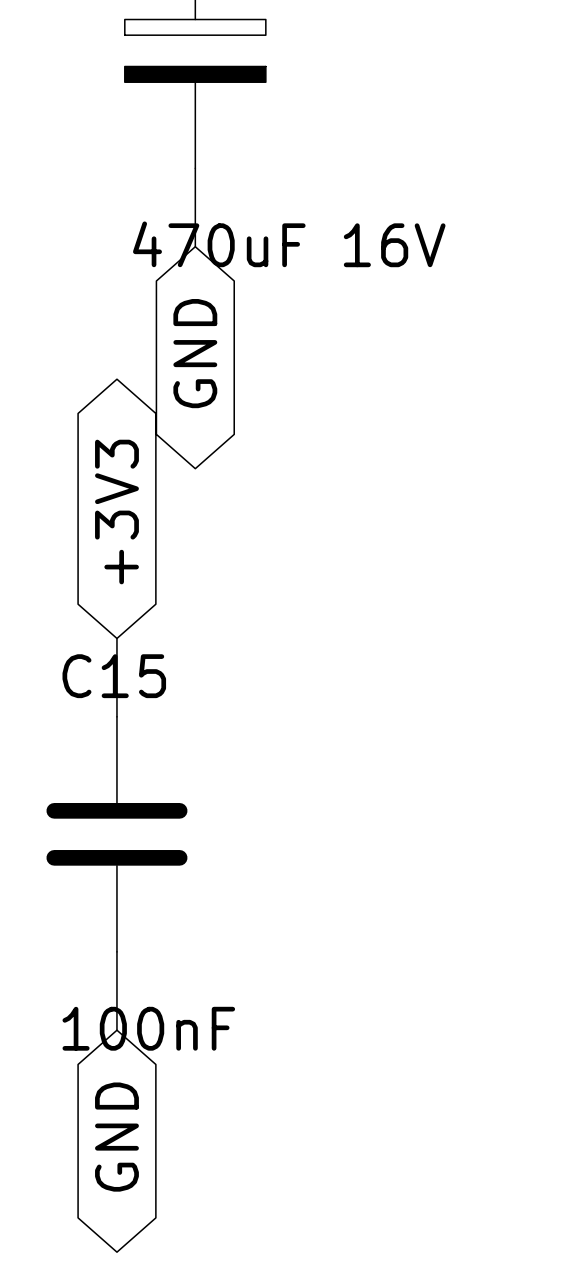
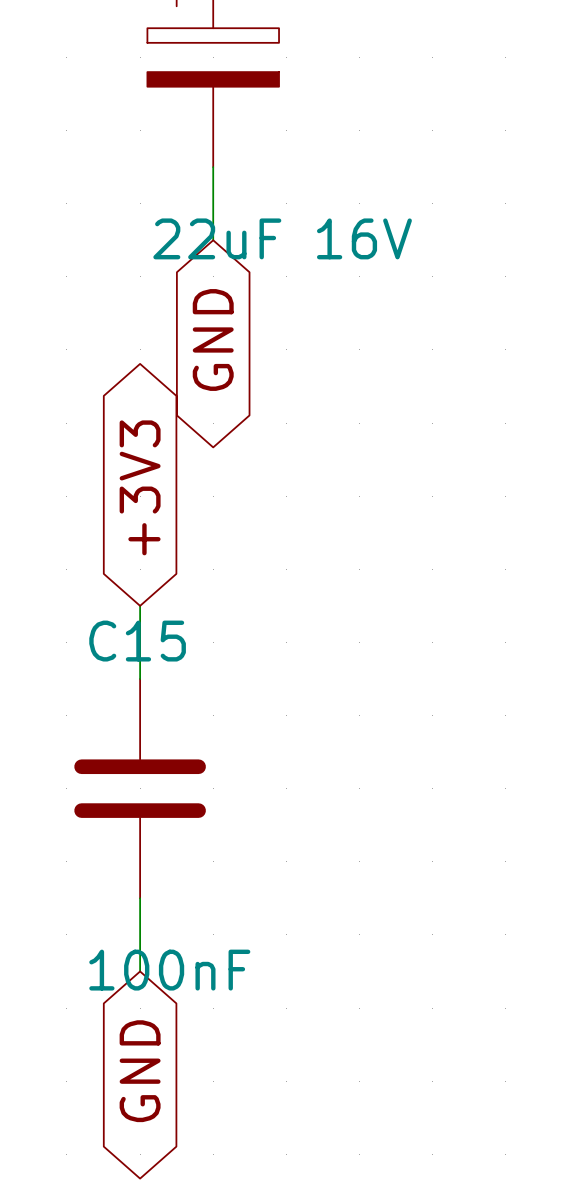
part value: 470uF 16V (289, 244) -> 22uF 16V (282, 238)

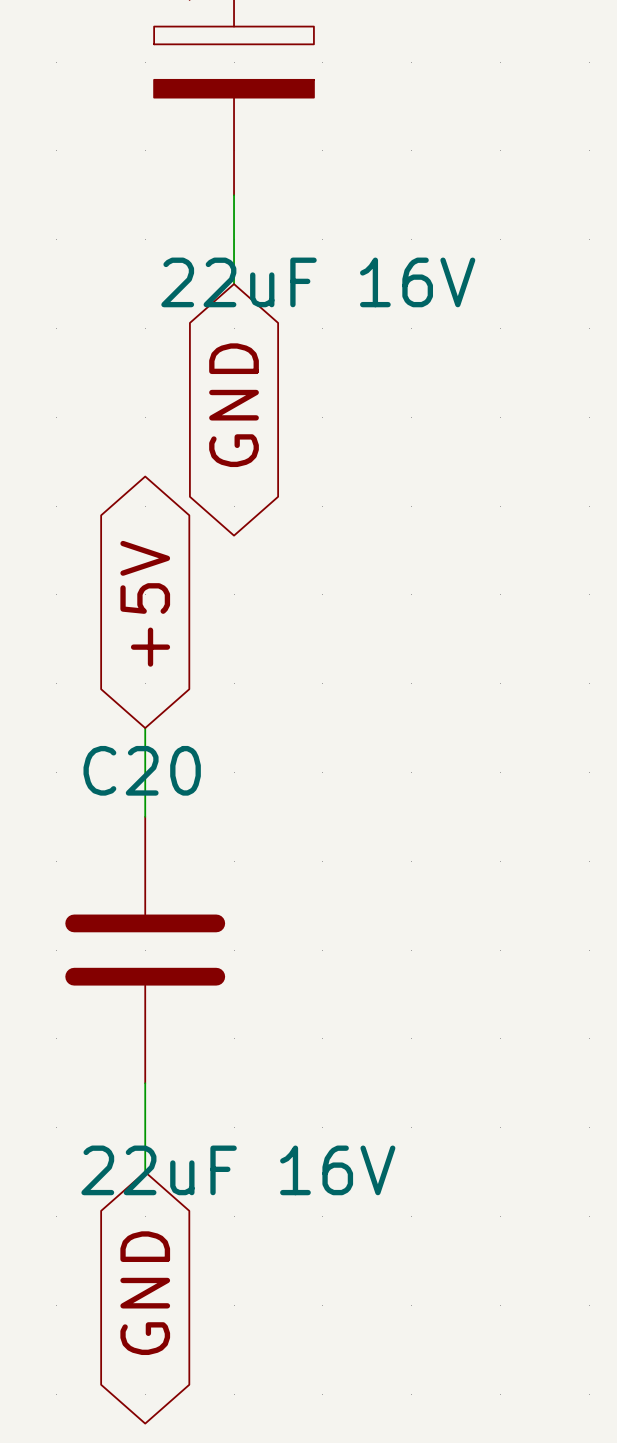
global label: +3V3 (140, 487) -> +5V (145, 603)
C15 name: C15 (137, 641) -> C20 (142, 770)
C15 value: 100nF (169, 970) -> 22uF 16V (238, 1170)

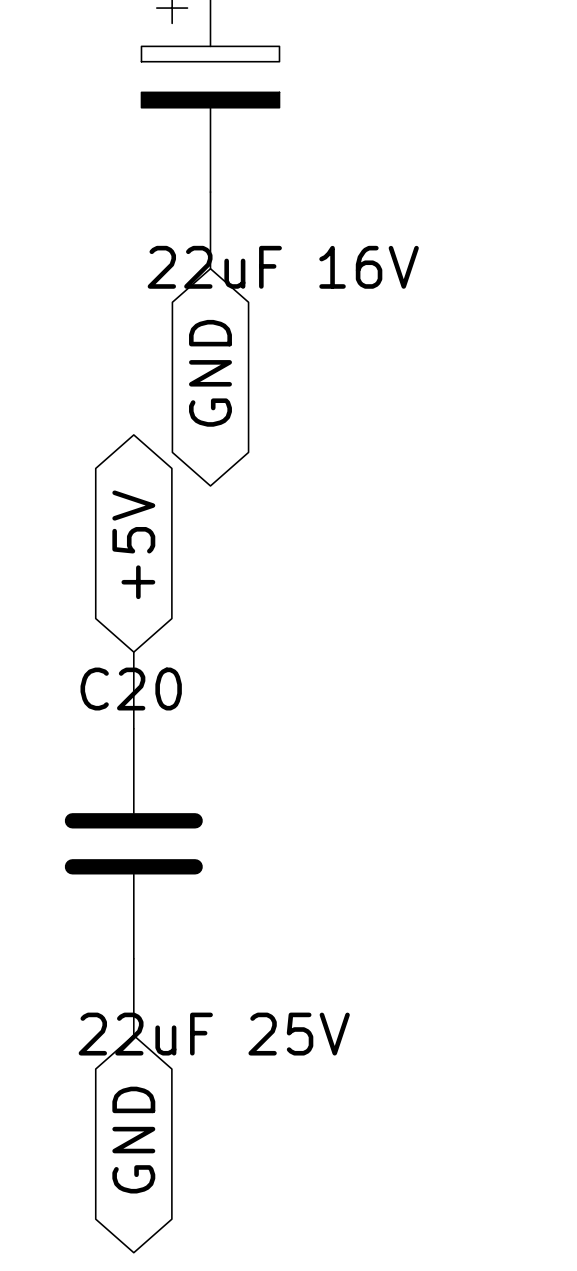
C20 value: 22uF 16V (238, 1170) -> 22uF 25V (214, 1034)

